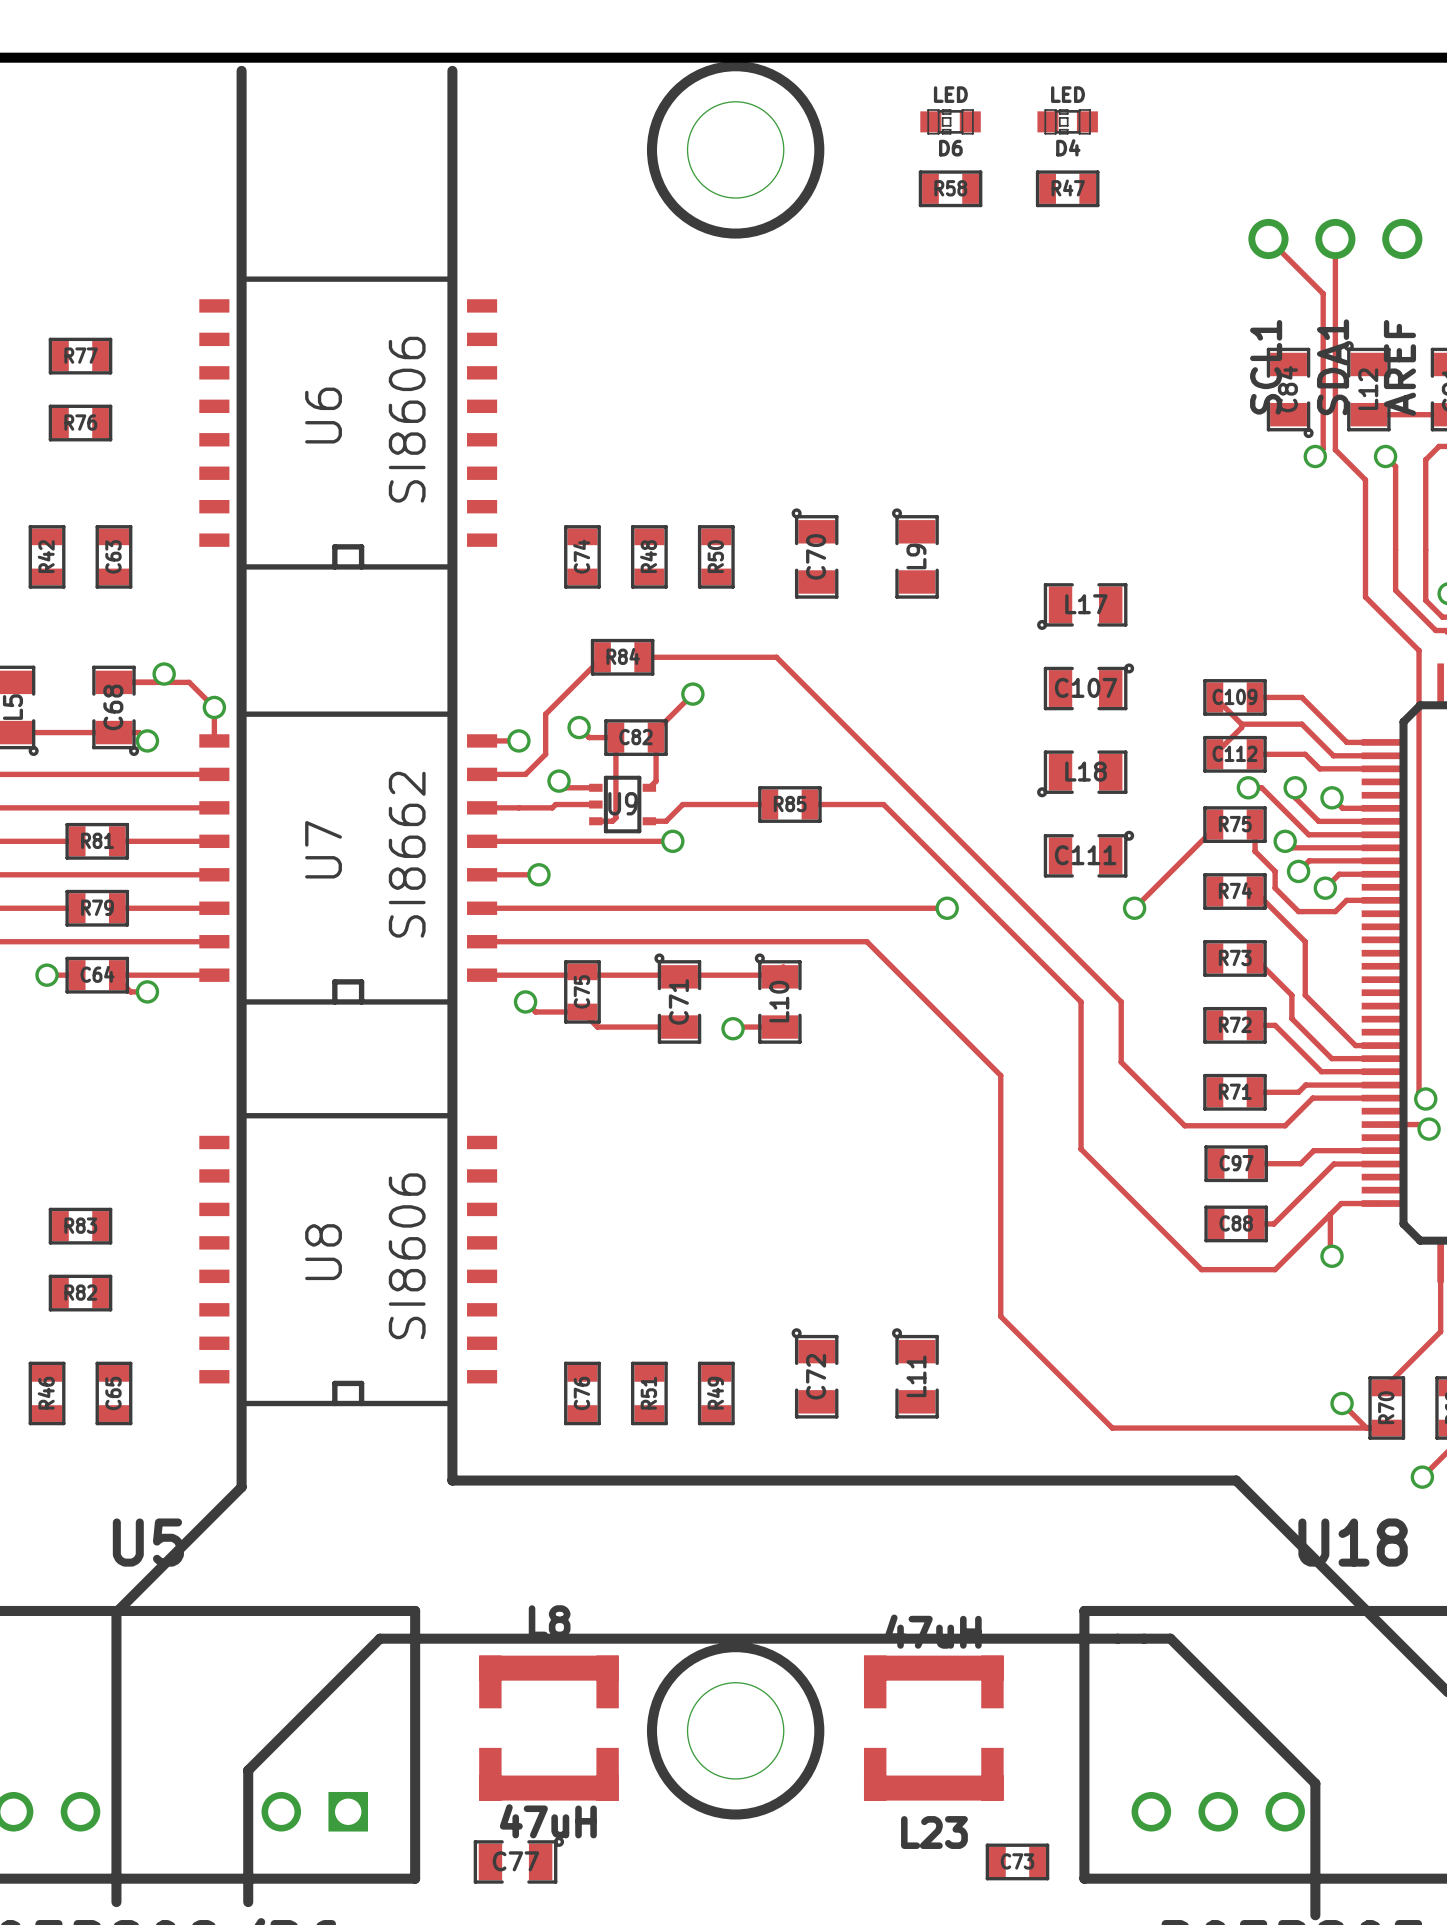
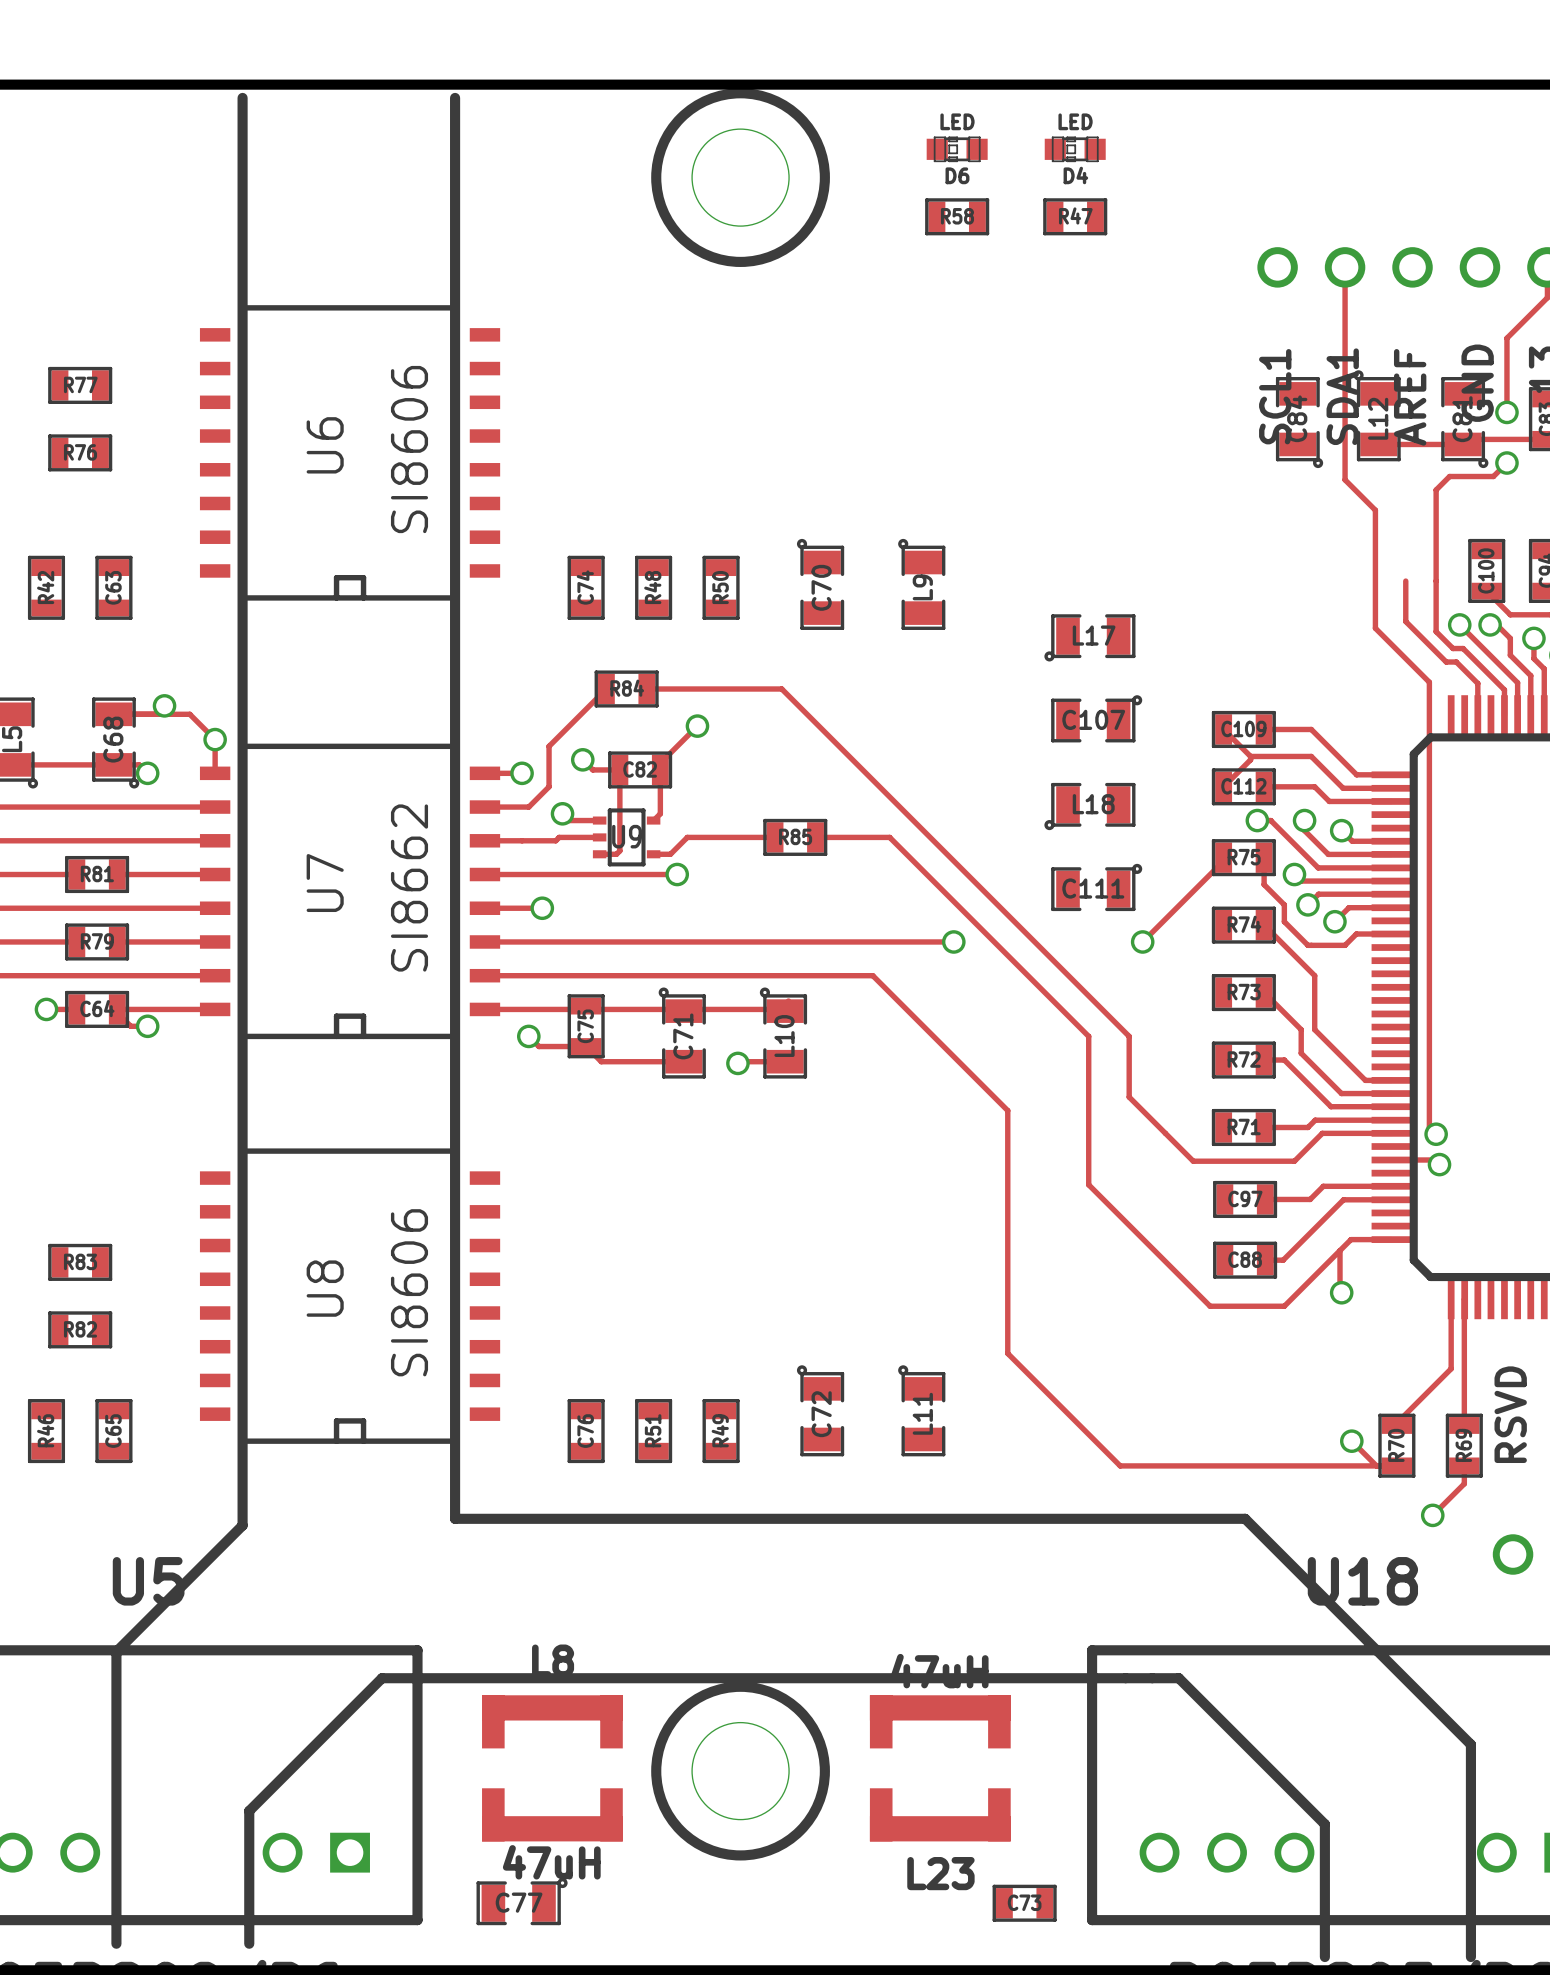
track: (1268, 238) (1323, 293) (1323, 448) (1315, 456) -> none
via: (1315, 456) -> none
track: (1385, 456) (1395, 466) (1395, 550) -> none
via: (1385, 456) -> none

